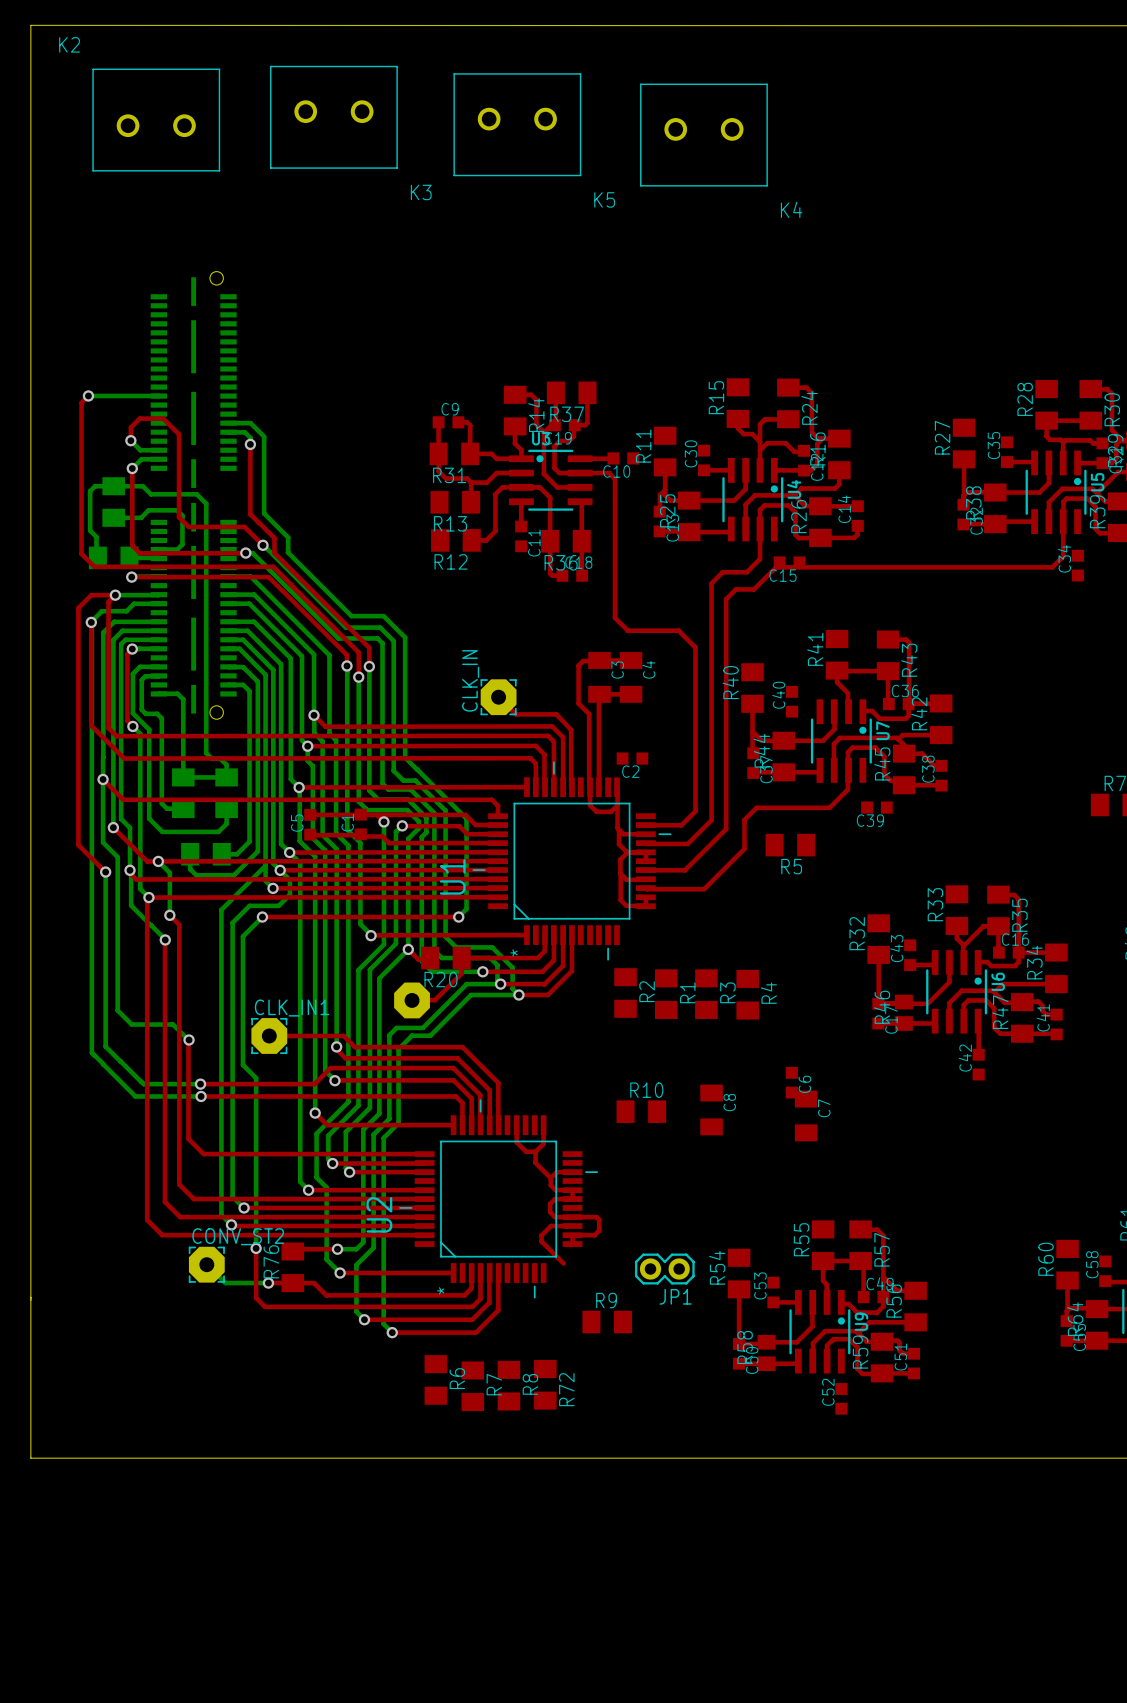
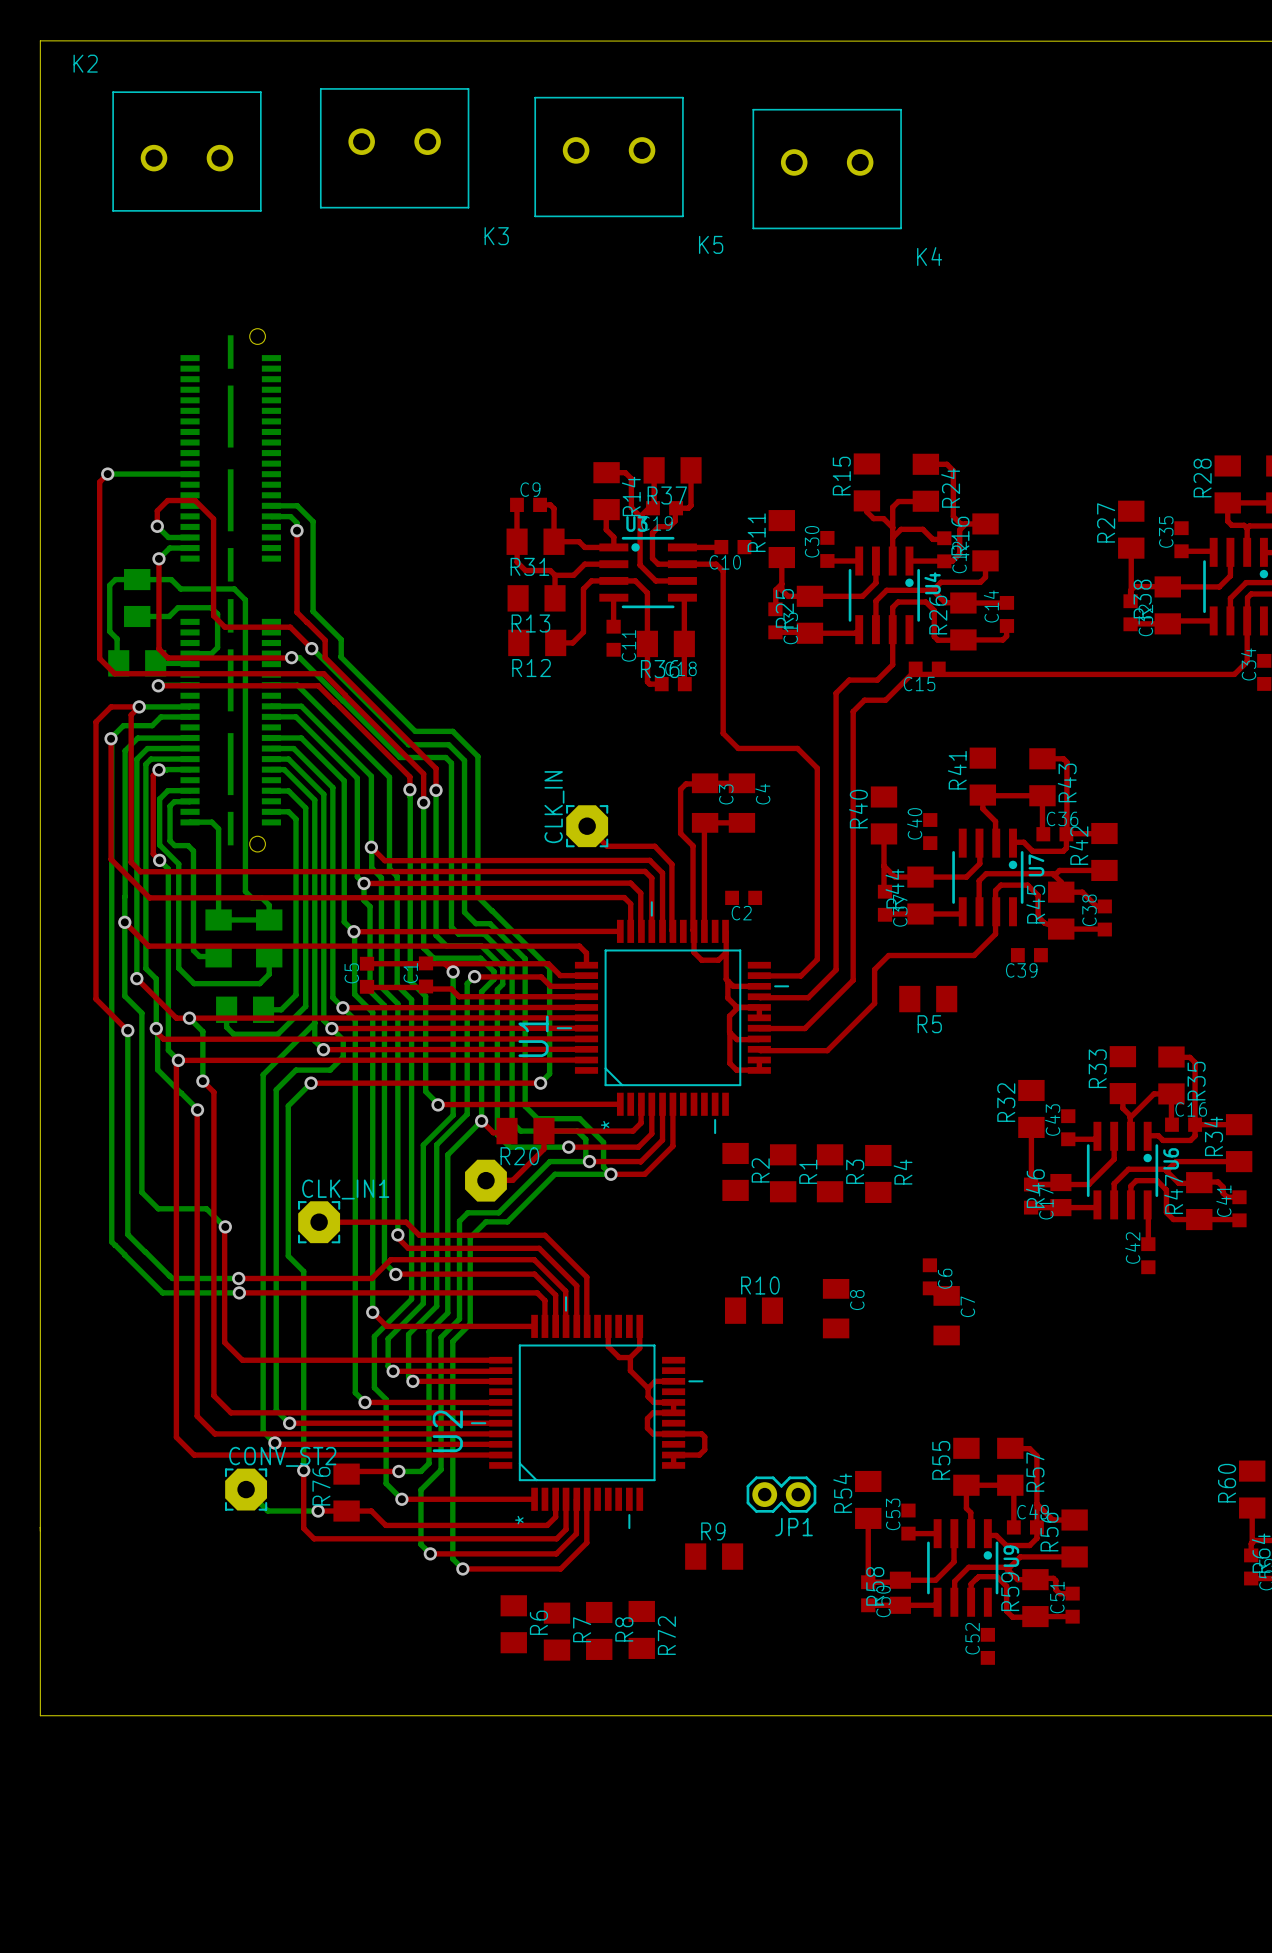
top track: (572, 1226) (551, 1226) (541, 1235) (541, 1241) (563, 1263) -> none

